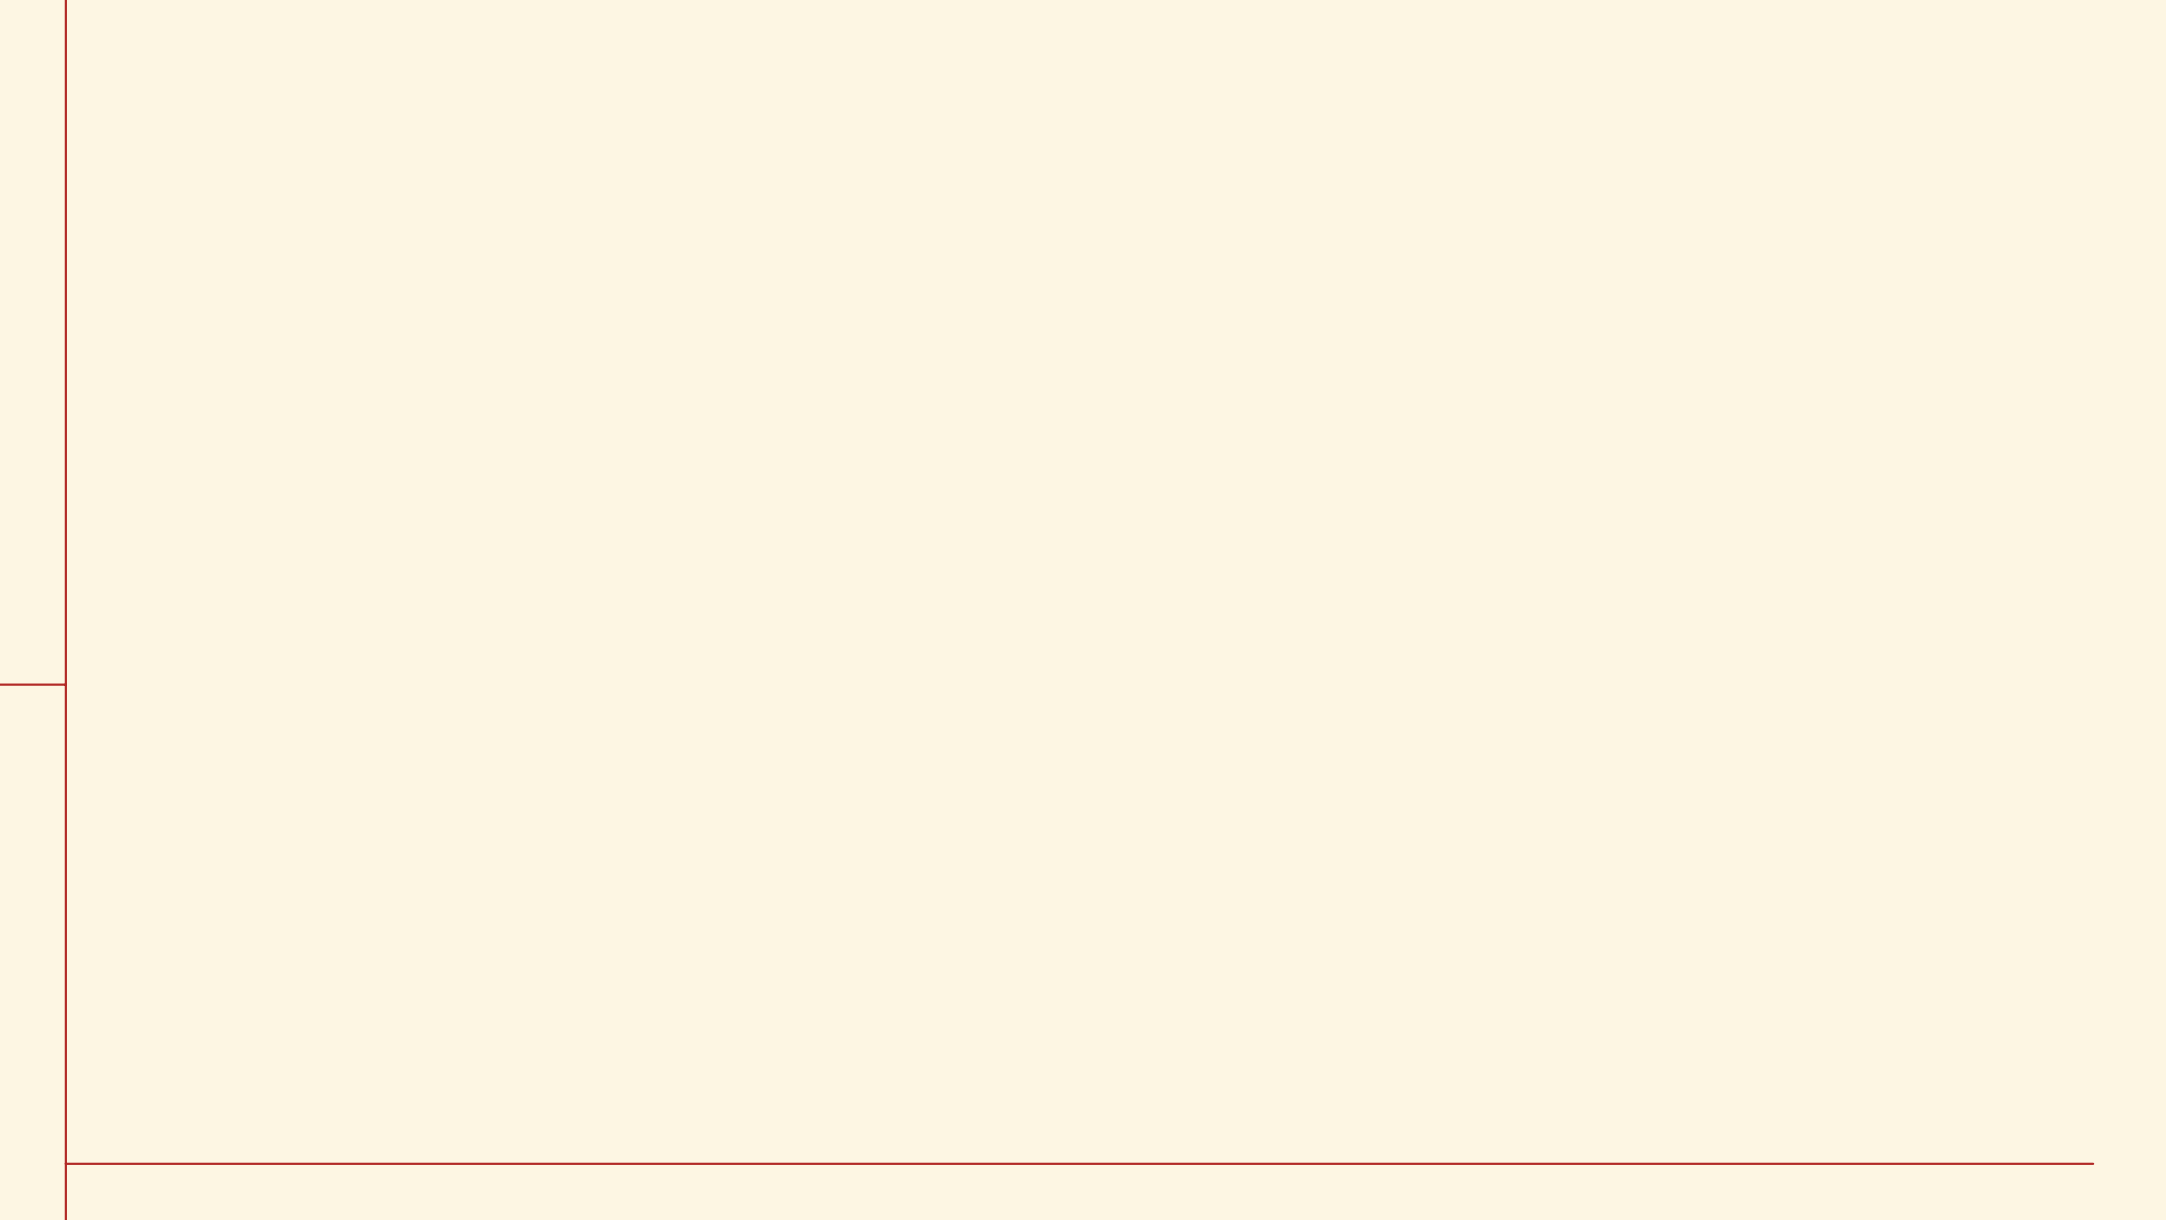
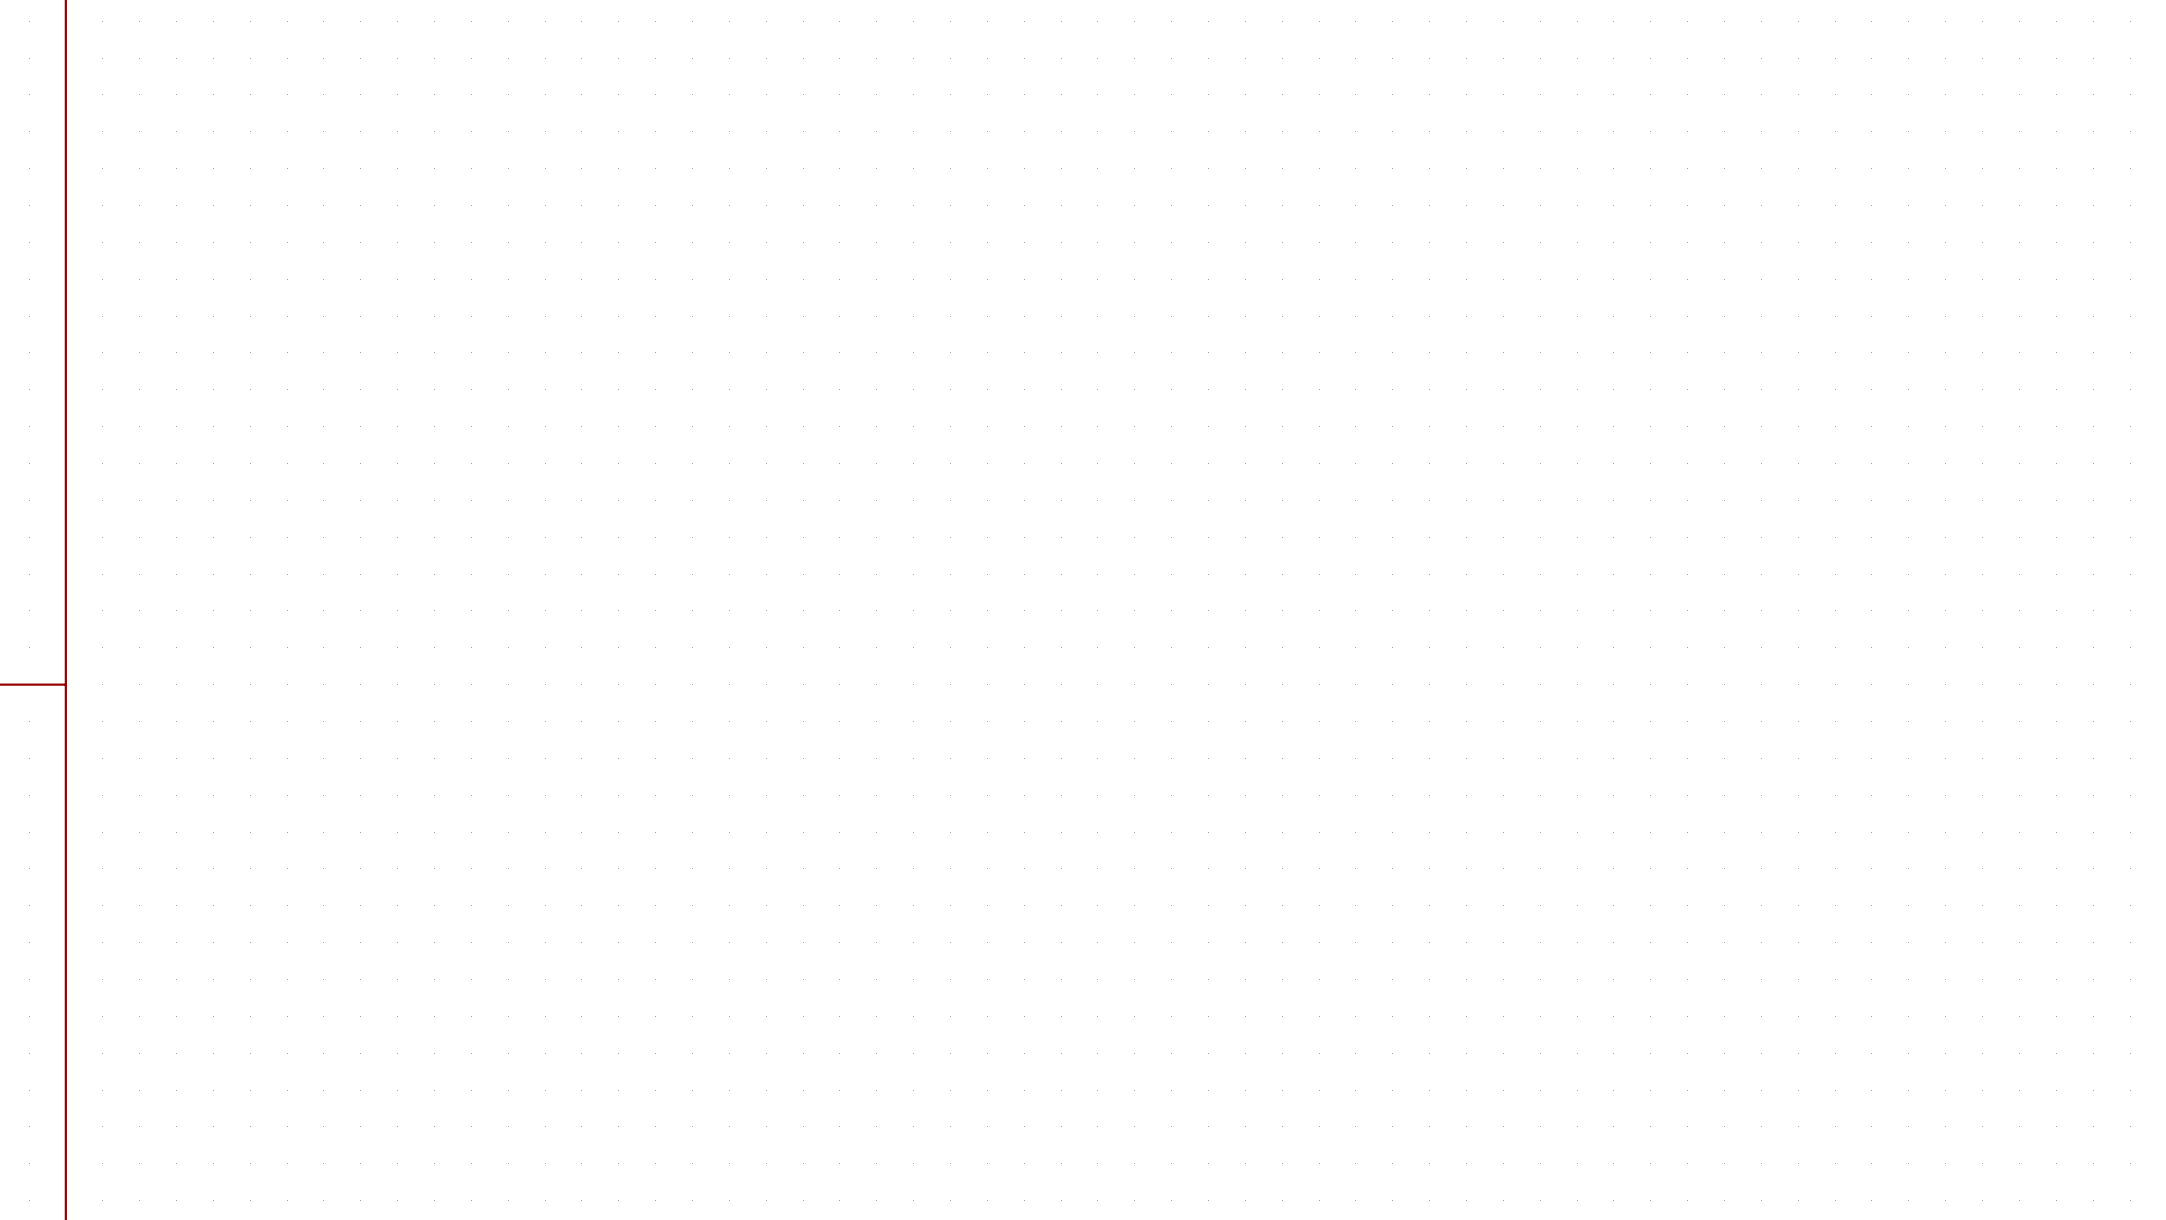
line: (65, 1163) (2093, 1163) -> none

